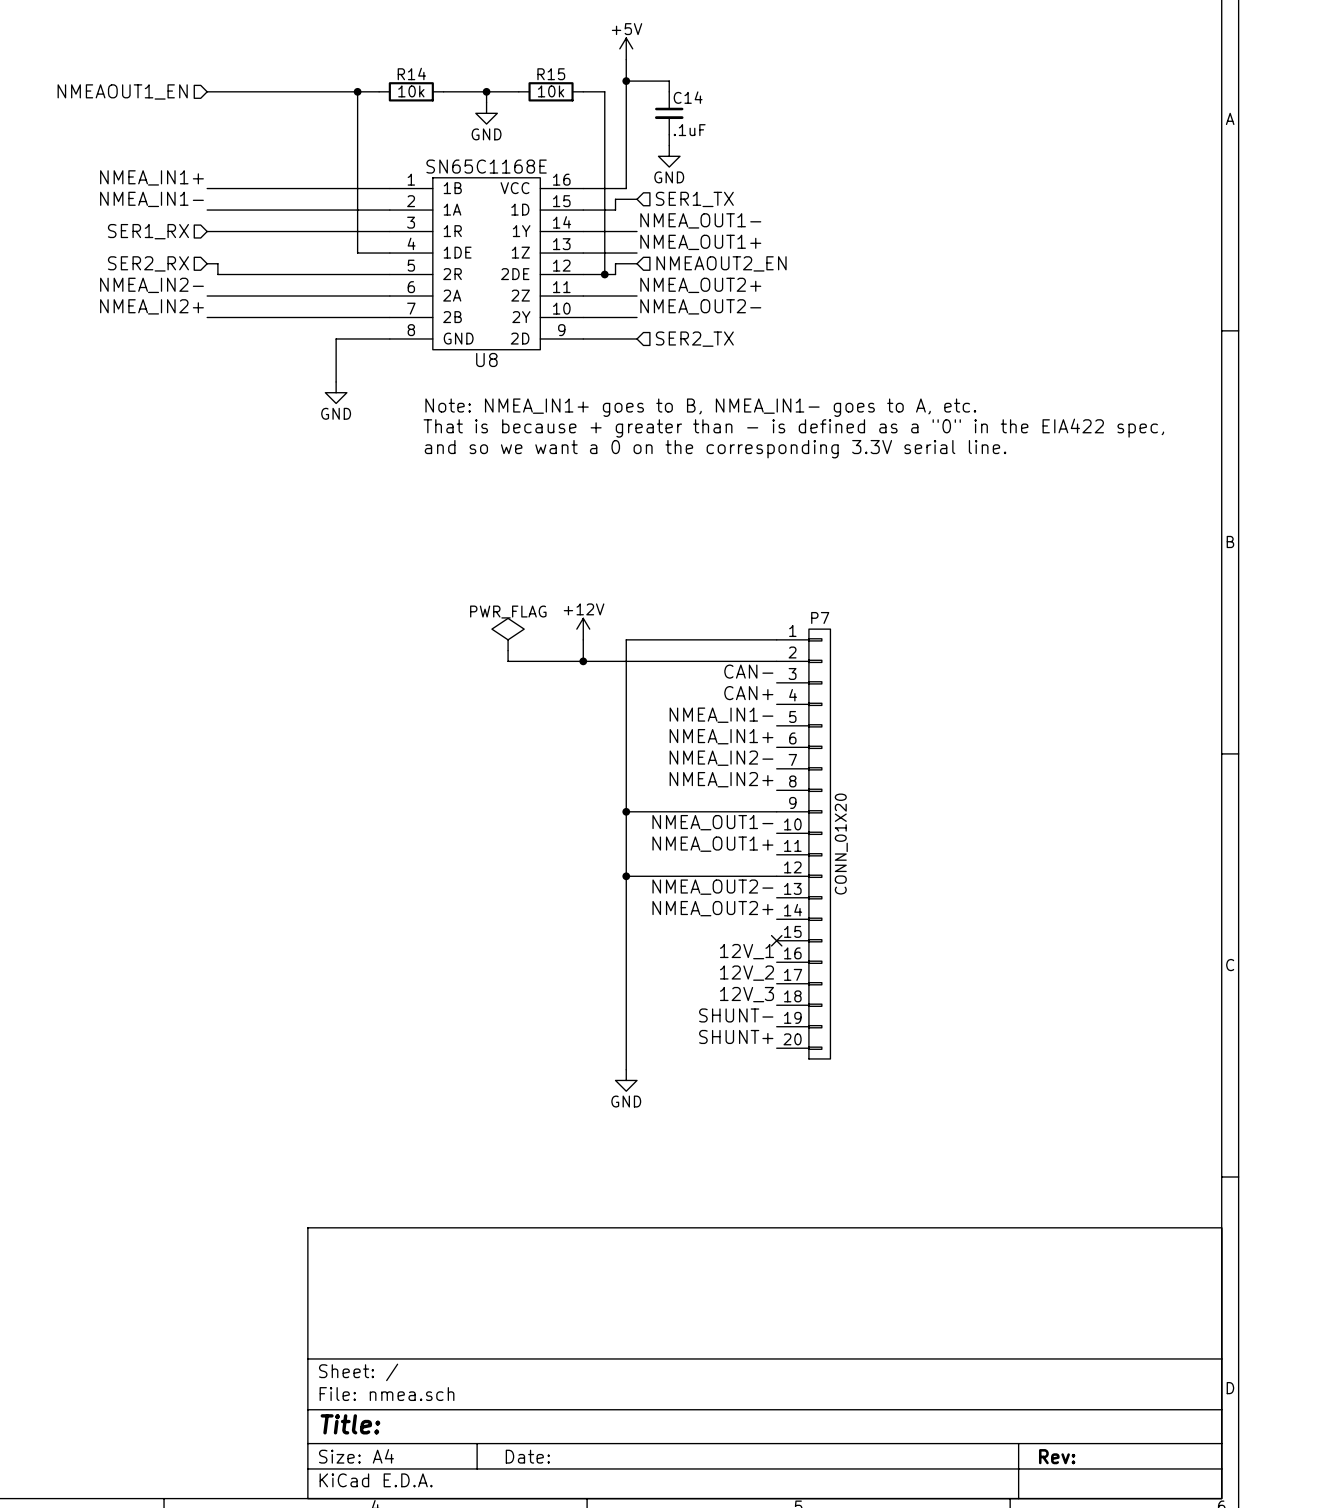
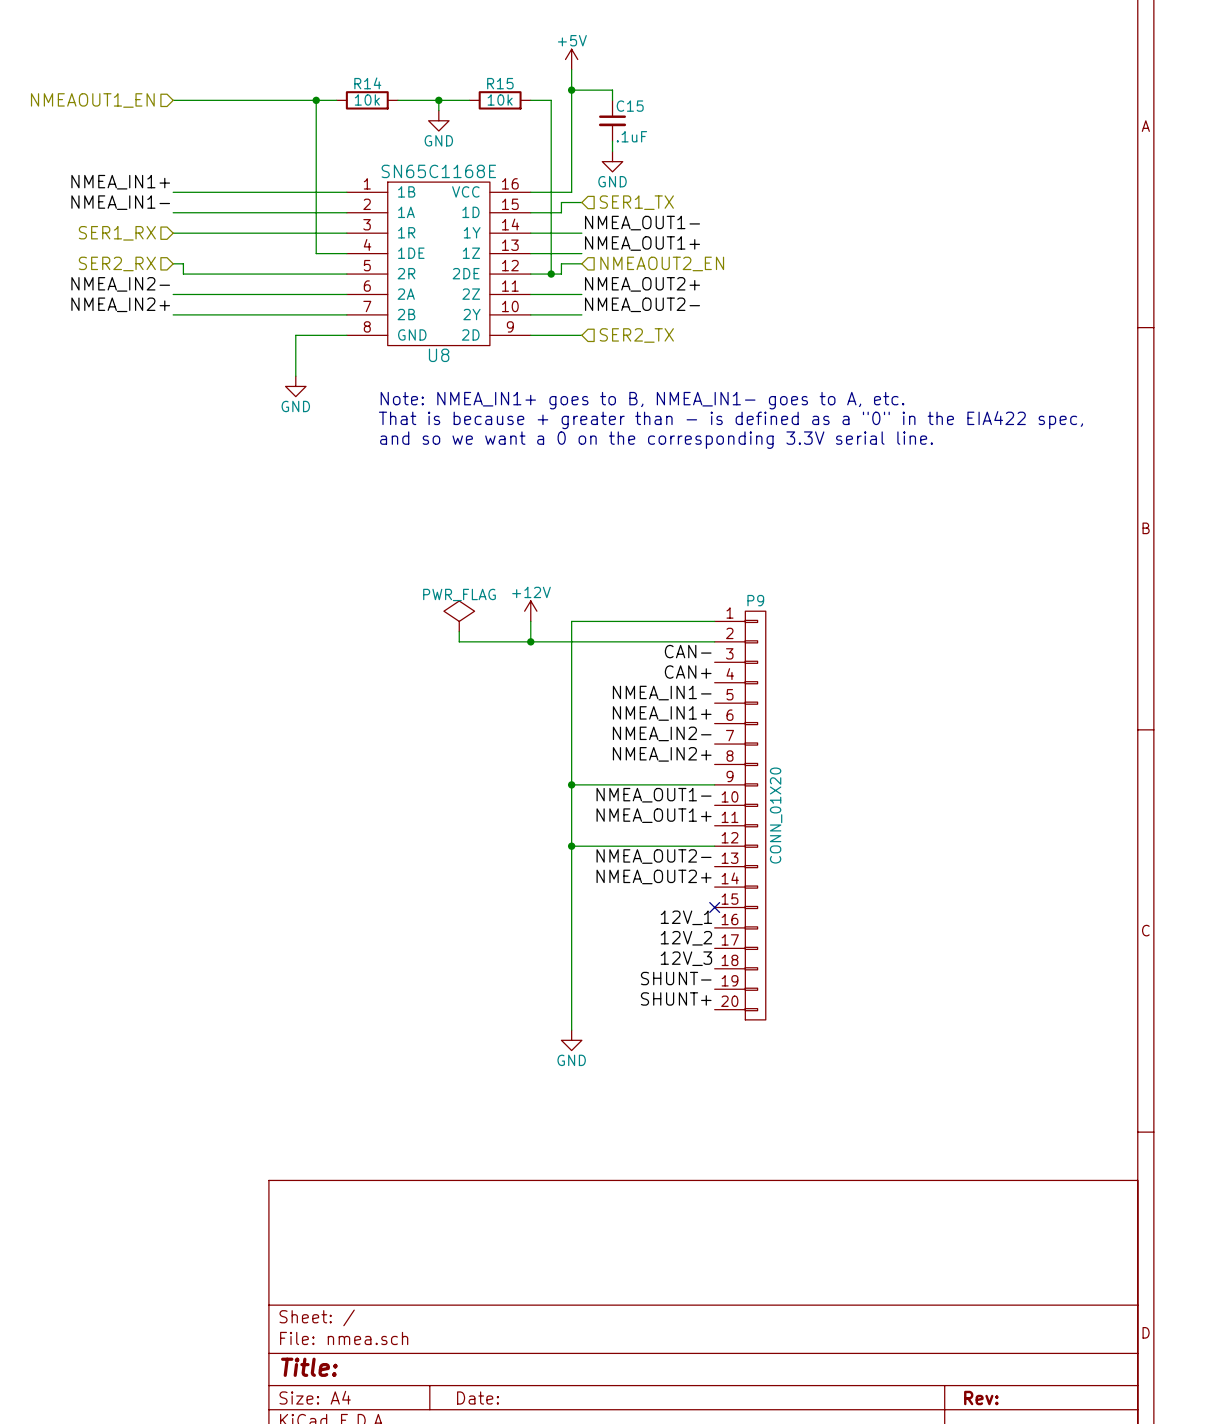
C14 name: C14 (688, 97) -> C15 (630, 106)
P7 name: P7 (820, 617) -> P9 (755, 600)

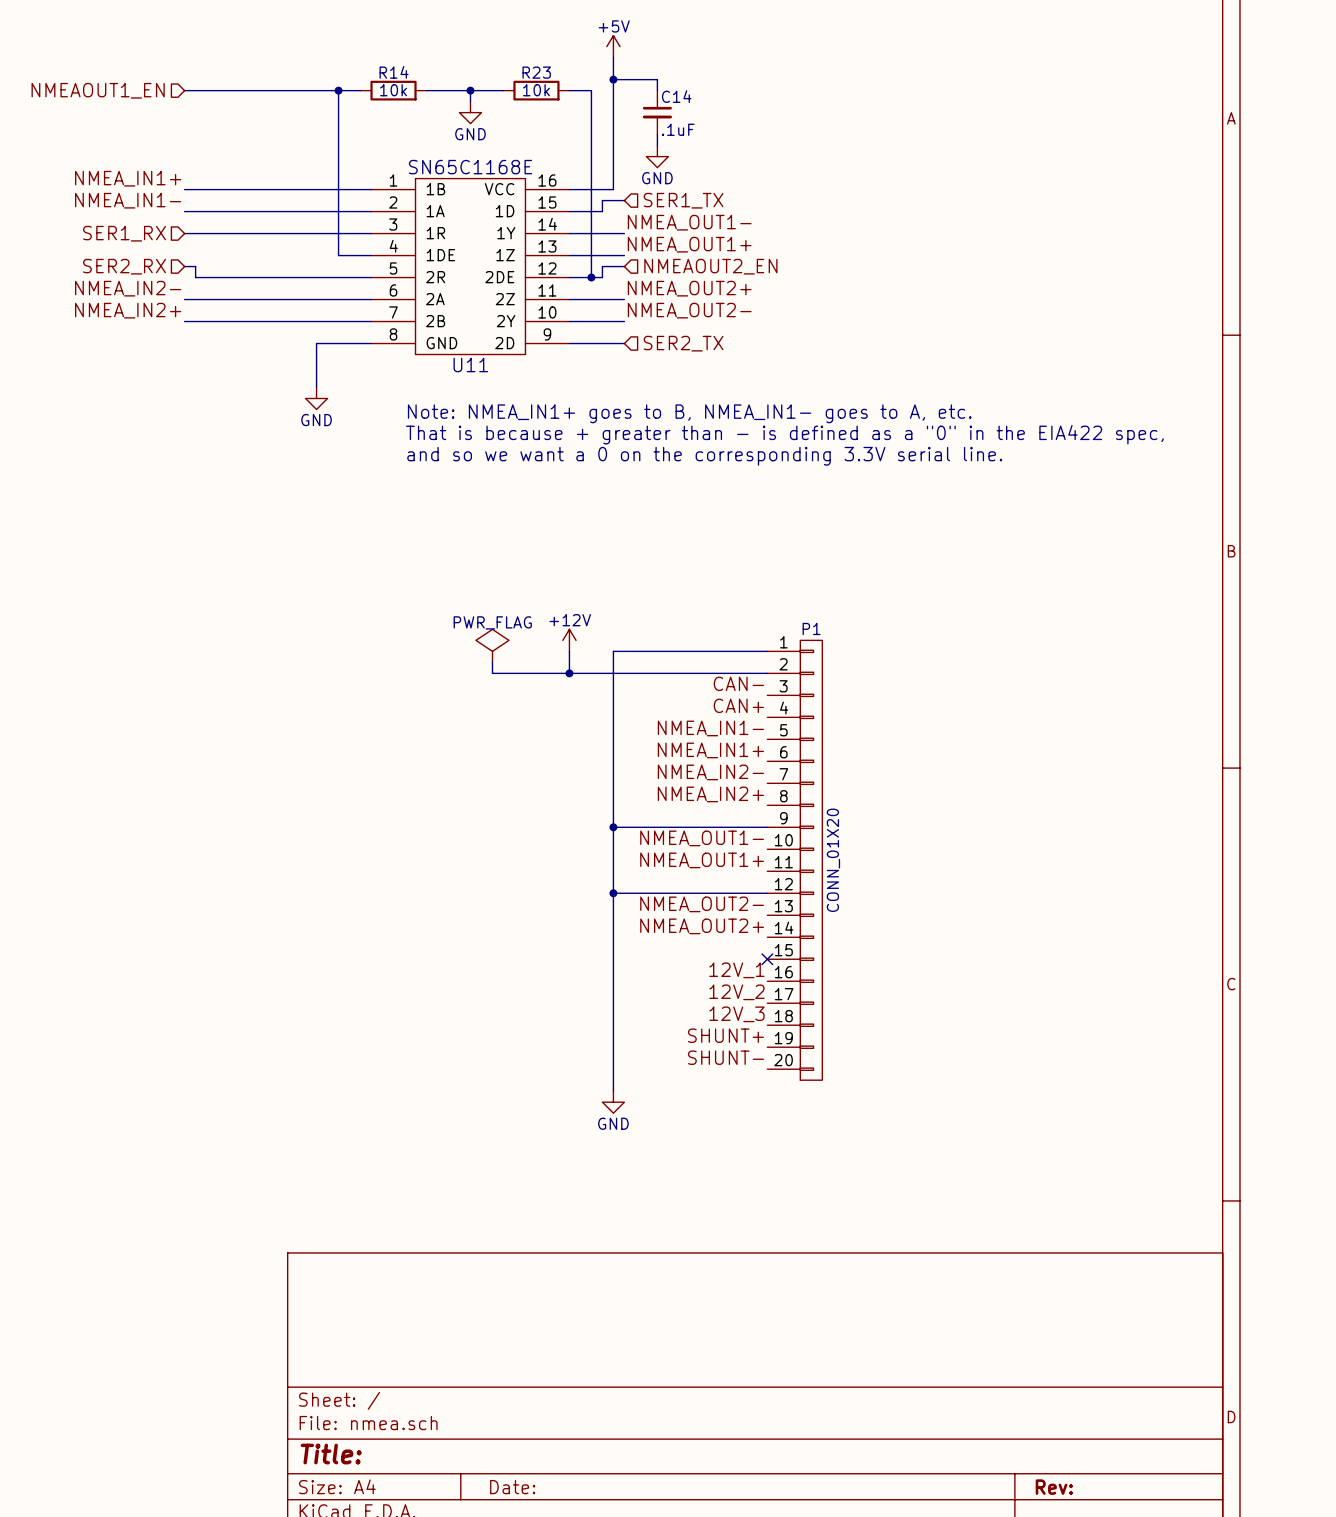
R15 name: R15 (500, 83) -> R23 (536, 72)
C15 name: C15 (630, 106) -> C14 (676, 96)
U8 name: U8 (439, 355) -> U11 (470, 365)
P9 name: P9 (755, 600) -> P1 (811, 628)
label: SHUNT- (676, 978) -> SHUNT+ (725, 1035)
label: SHUNT+ (676, 998) -> SHUNT- (725, 1057)

